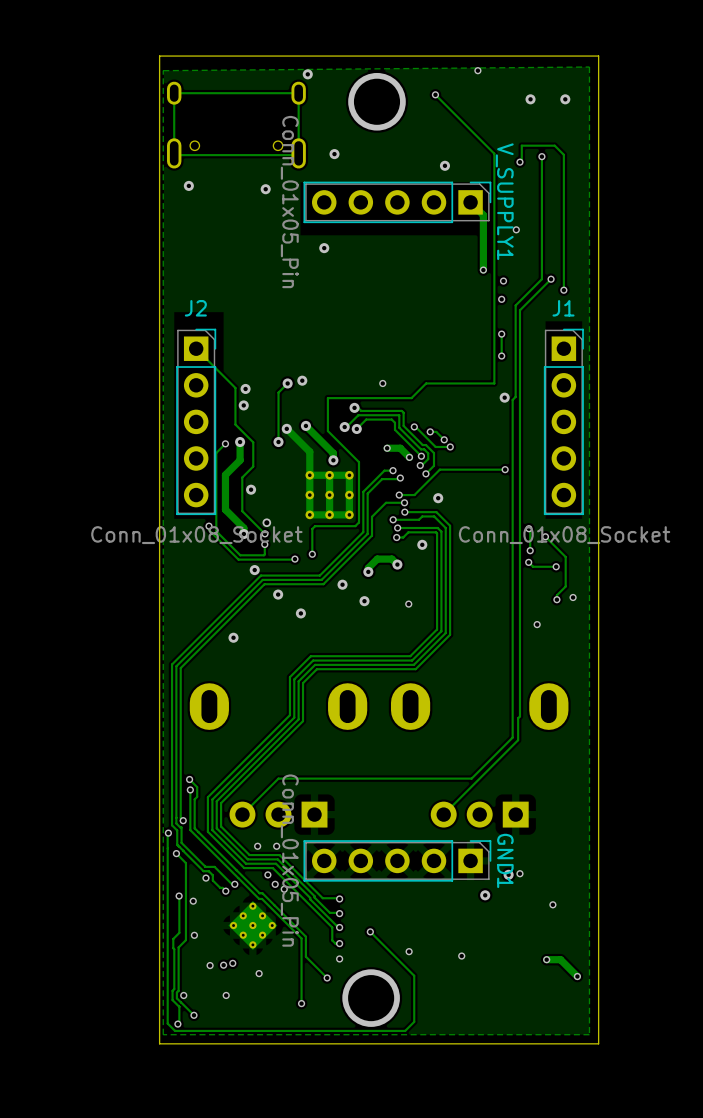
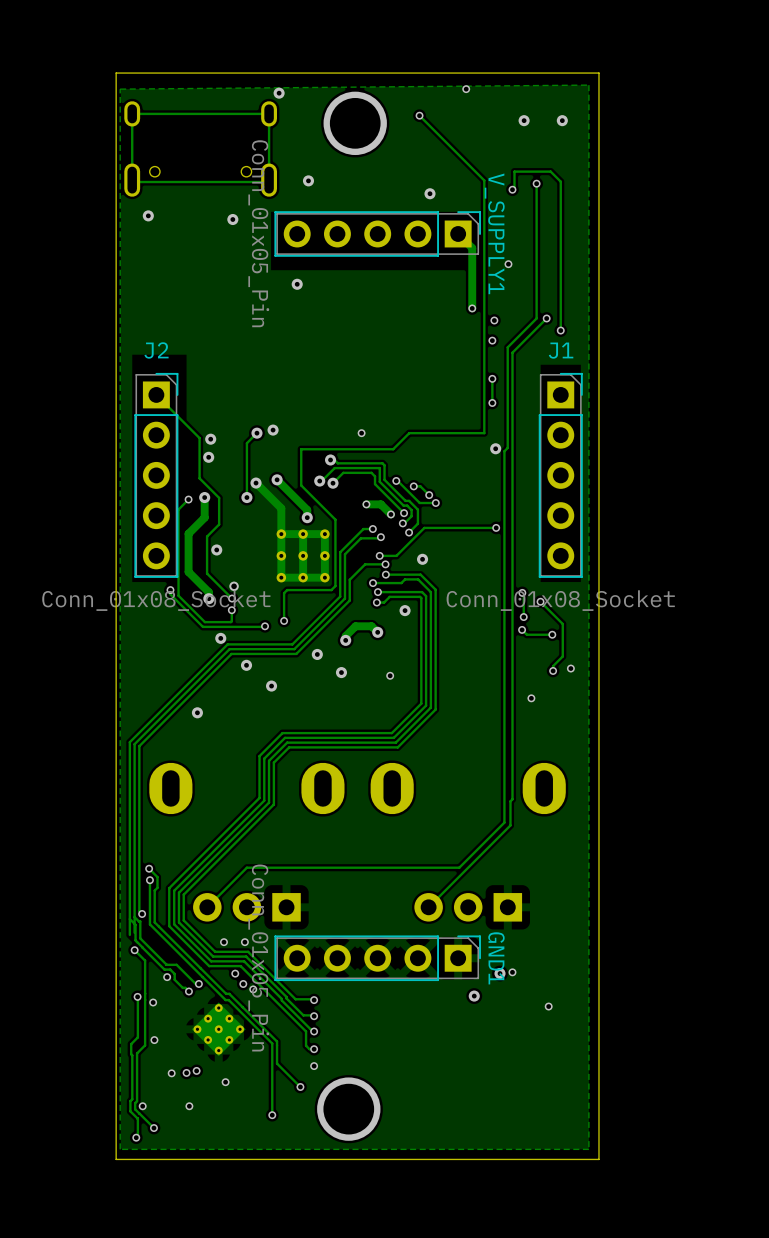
track: (168, 833) (167, 1023) (175, 1030) (405, 1030) (414, 1021) (414, 975) (370, 931) -> none
via: (168, 833) -> none
via: (370, 931) -> none
via: (409, 951) -> none
via: (461, 956) -> none
track: (546, 959) (560, 959) (577, 976) -> none
via: (546, 959) -> none
via: (577, 976) -> none

